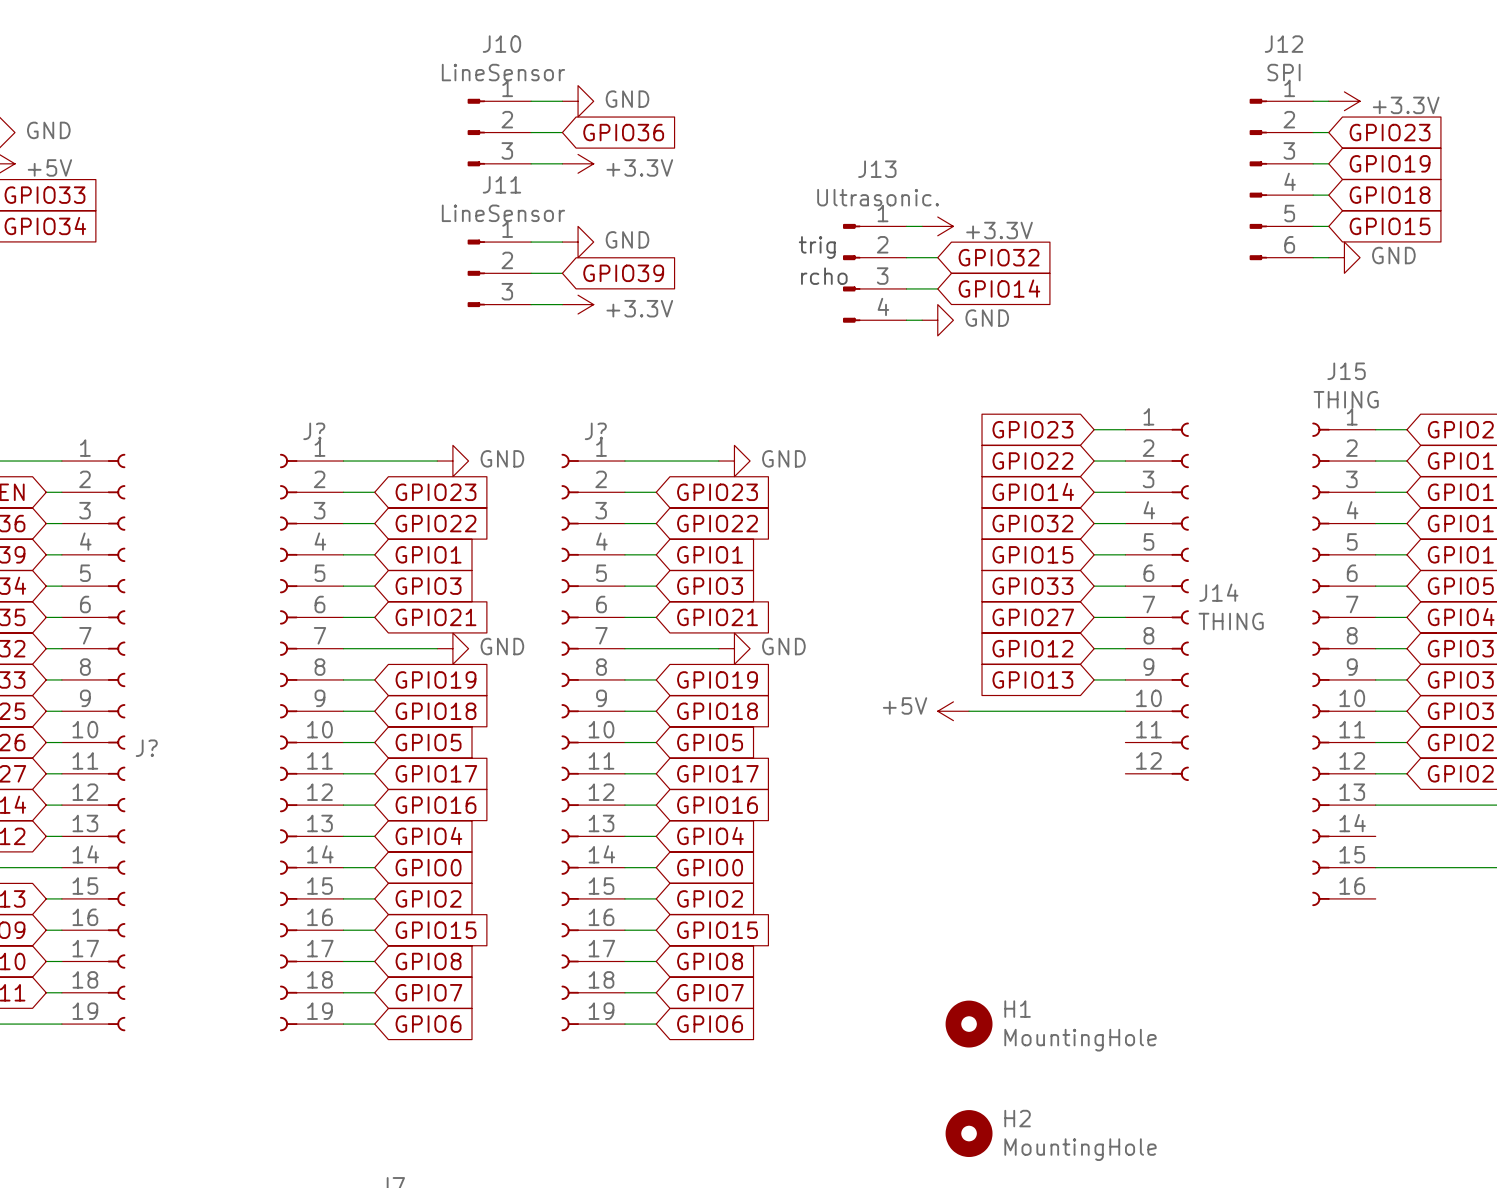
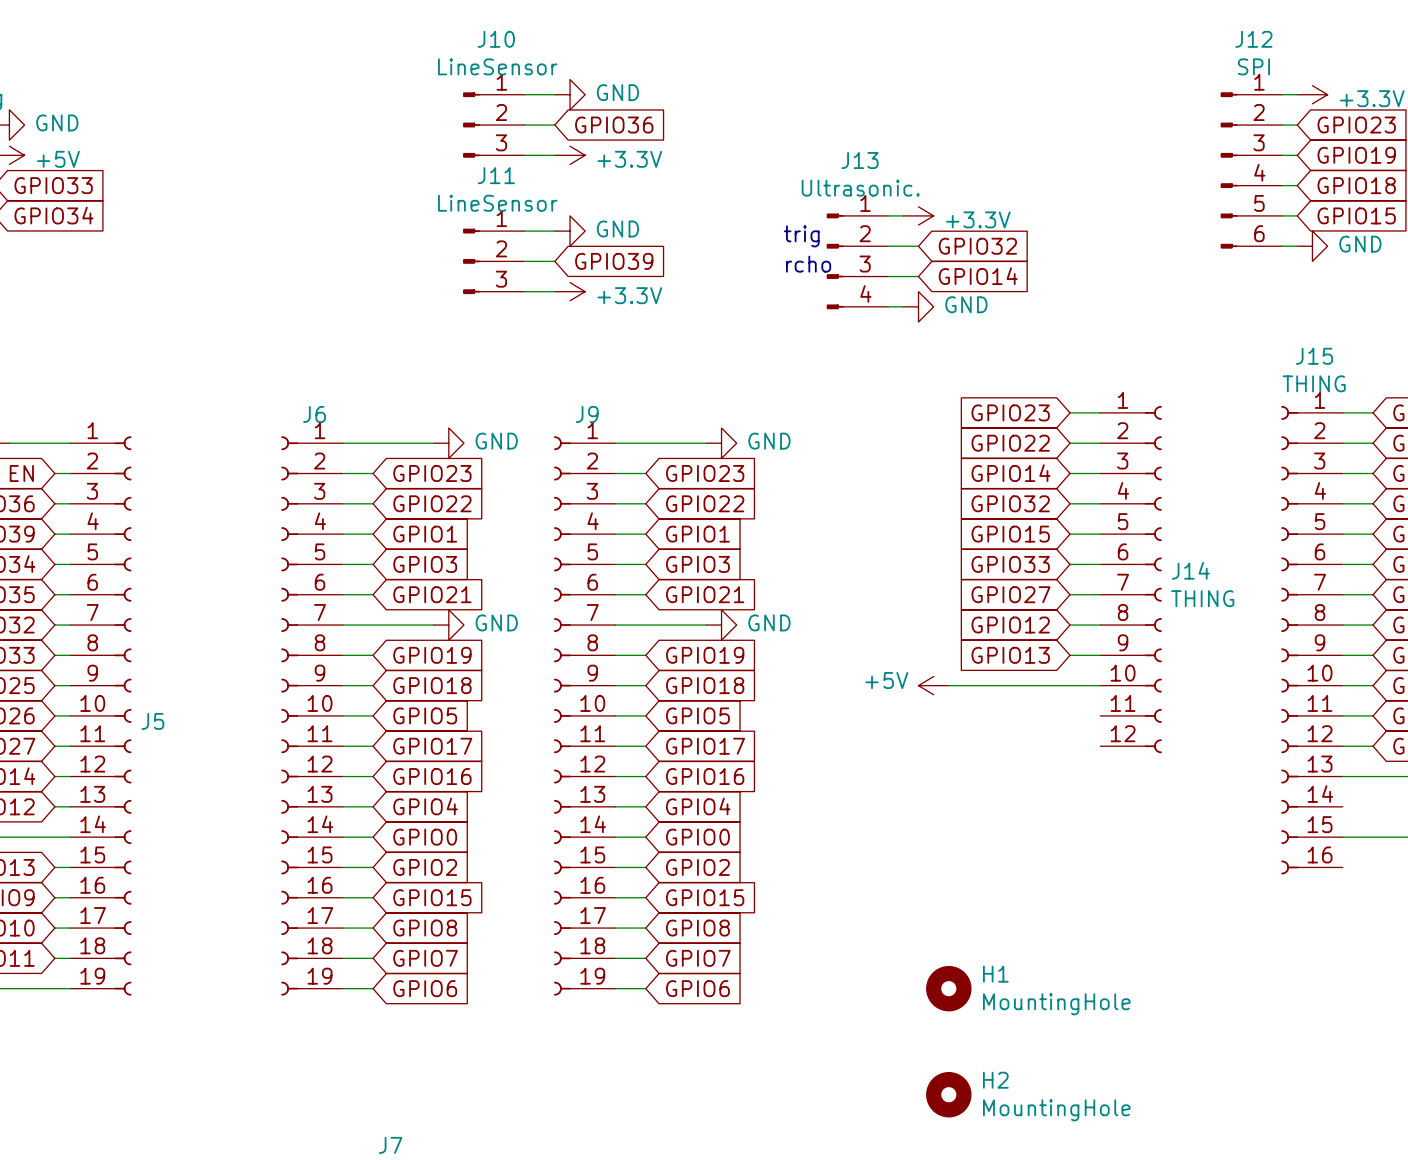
J? name: J? (314, 431) -> J6 (314, 414)
J? name: J? (595, 431) -> J9 (587, 414)
J? name: J? (146, 748) -> J5 (152, 721)

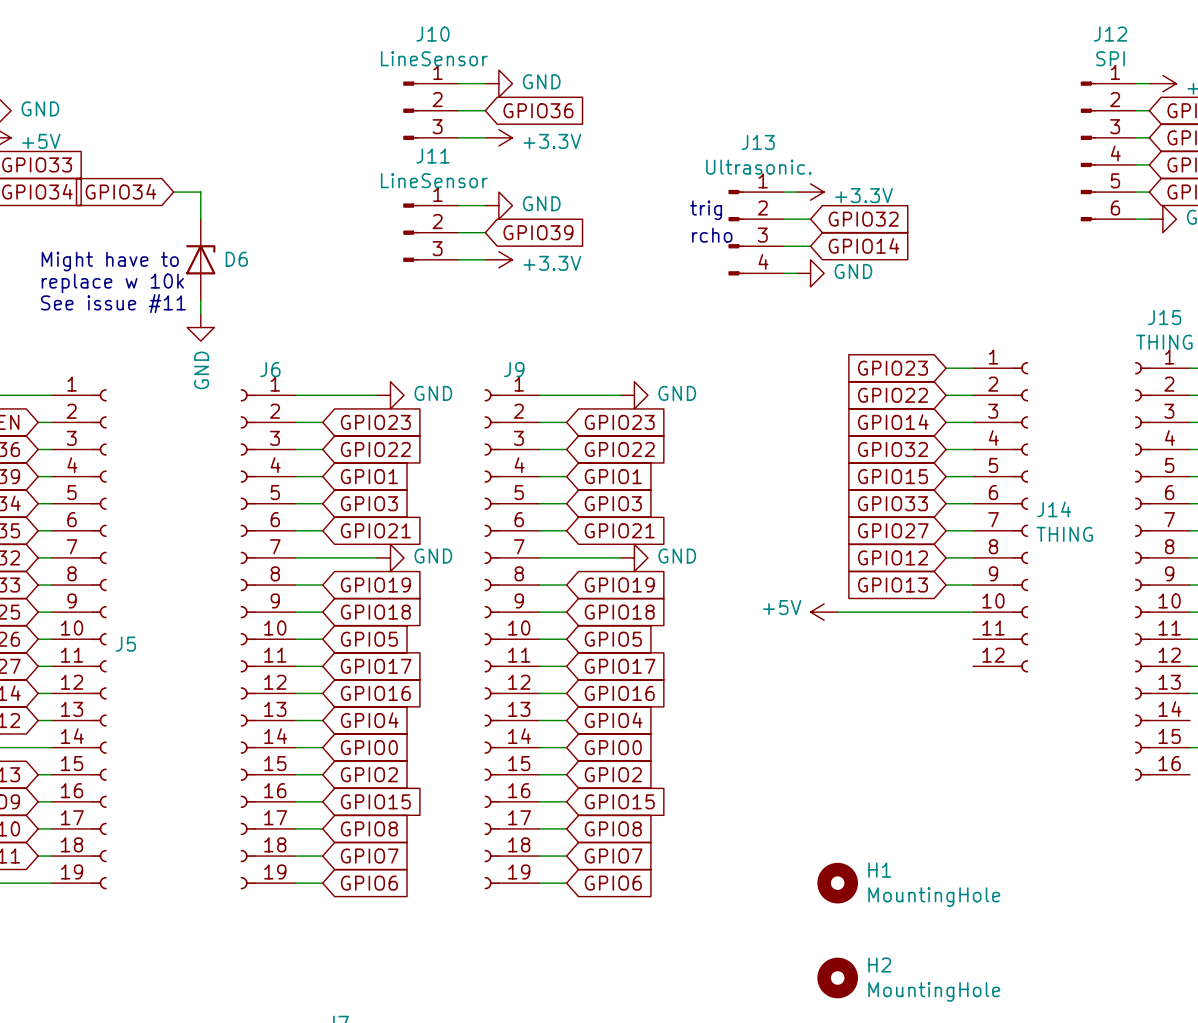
global label: none -> GPIO34 (120, 191)
wire: none -> (173, 192) (200, 192) (200, 219)
D6: none -> (200, 259)
text: none -> Might have to (110, 261)
text: none -> replace w 10k (112, 283)
wire: none -> (200, 300) (200, 314)
text: none -> See issue #11 (113, 303)
power symbol: none -> GND (200, 327)

